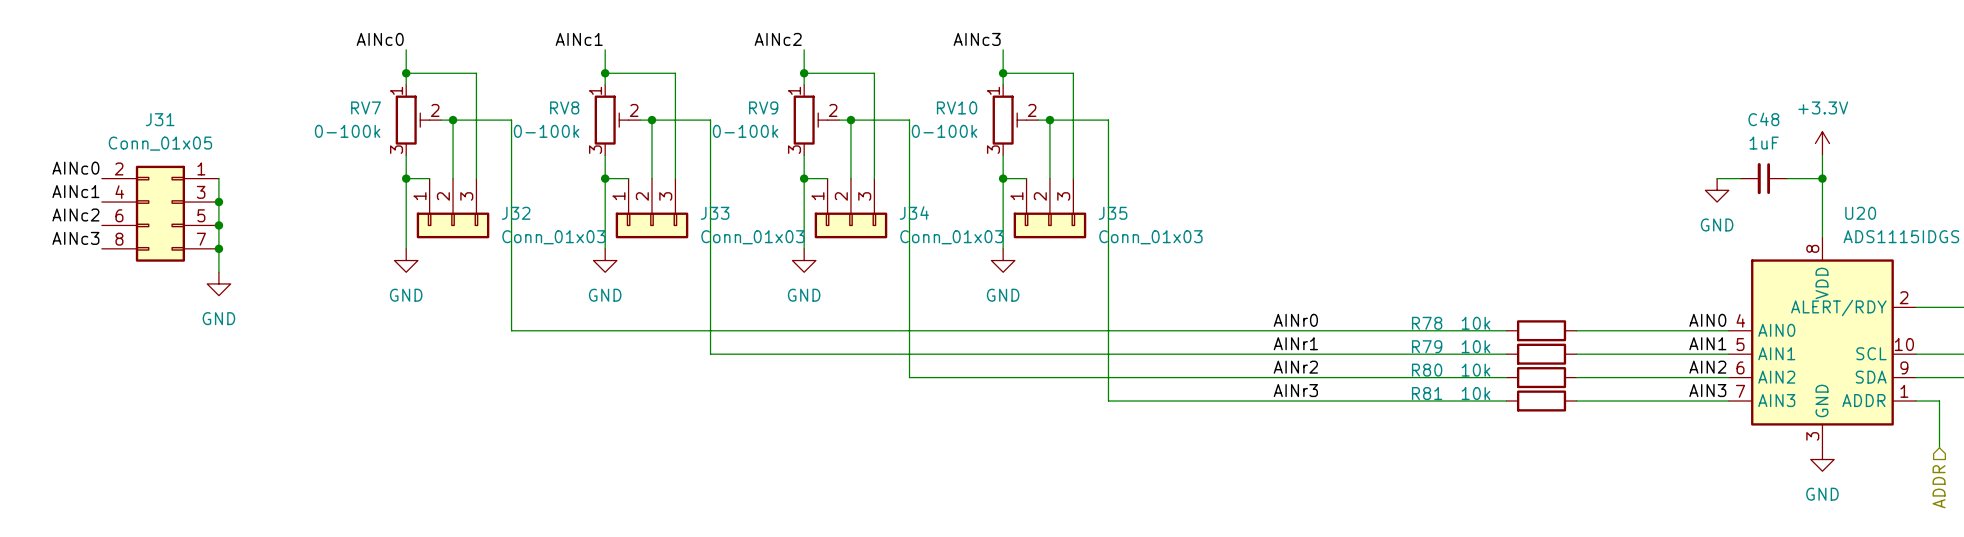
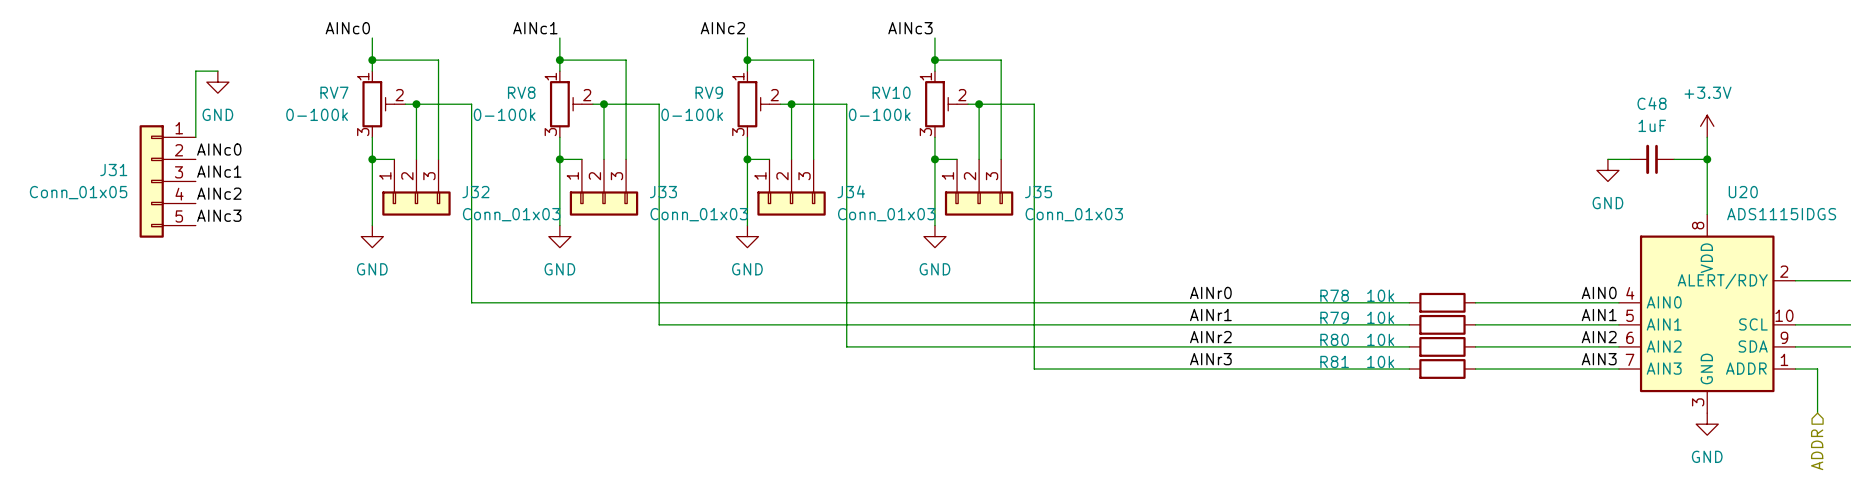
wire: none -> (217, 71) (195, 71) (195, 137)
J31 name position: J31 (160, 119) -> J31 (113, 170)
J31 value position: Conn_01x05 (160, 143) -> Conn_01x05 (78, 192)
J31 symbol: [101, 165, 219, 262] -> [139, 125, 196, 238]
label position: AINc0 (75, 168) -> AINc0 (219, 149)
wire: (218, 178) (218, 272) -> none
label position: AINc1 (75, 191) -> AINc1 (219, 171)
junction: (218, 202) -> none
label position: AINc2 (75, 214) -> AINc2 (219, 193)
junction: (218, 225) -> none
label position: AINc3 (75, 238) -> AINc3 (219, 215)
junction: (218, 248) -> none
power symbol position: GND (218, 283) -> GND (217, 82)

